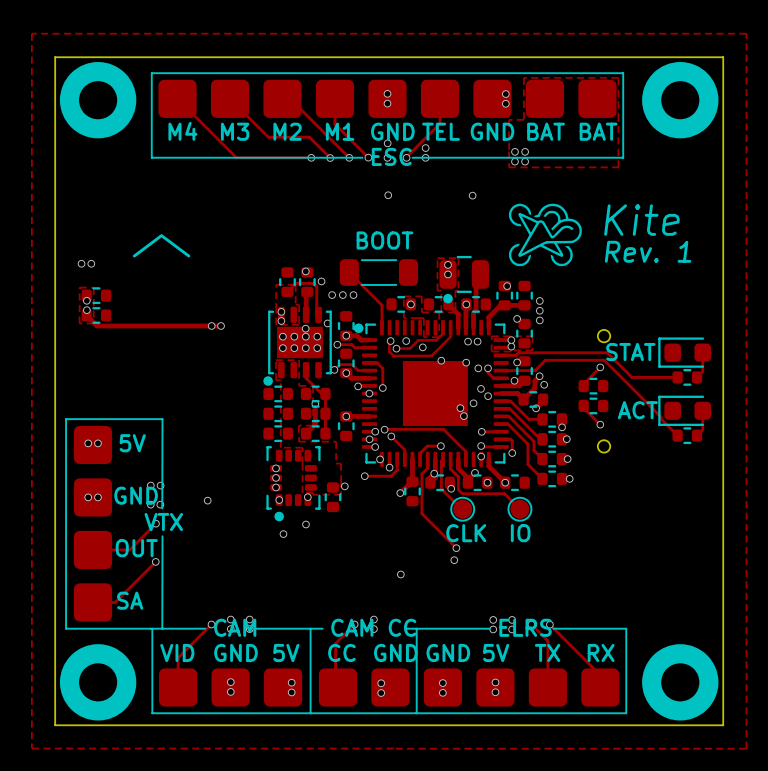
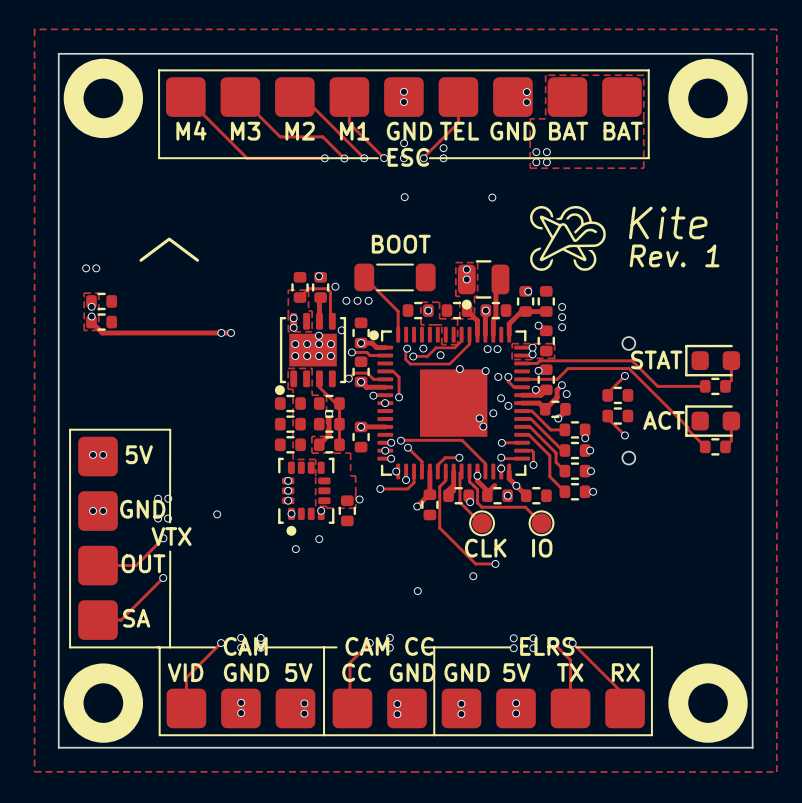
via: none -> (477, 475)
via: (474, 472) -> none
via: (434, 473) -> none
via: none -> (516, 485)
via: (505, 482) -> none
track: none -> (475, 563) (495, 563)
via position: (456, 548) -> (495, 563)

